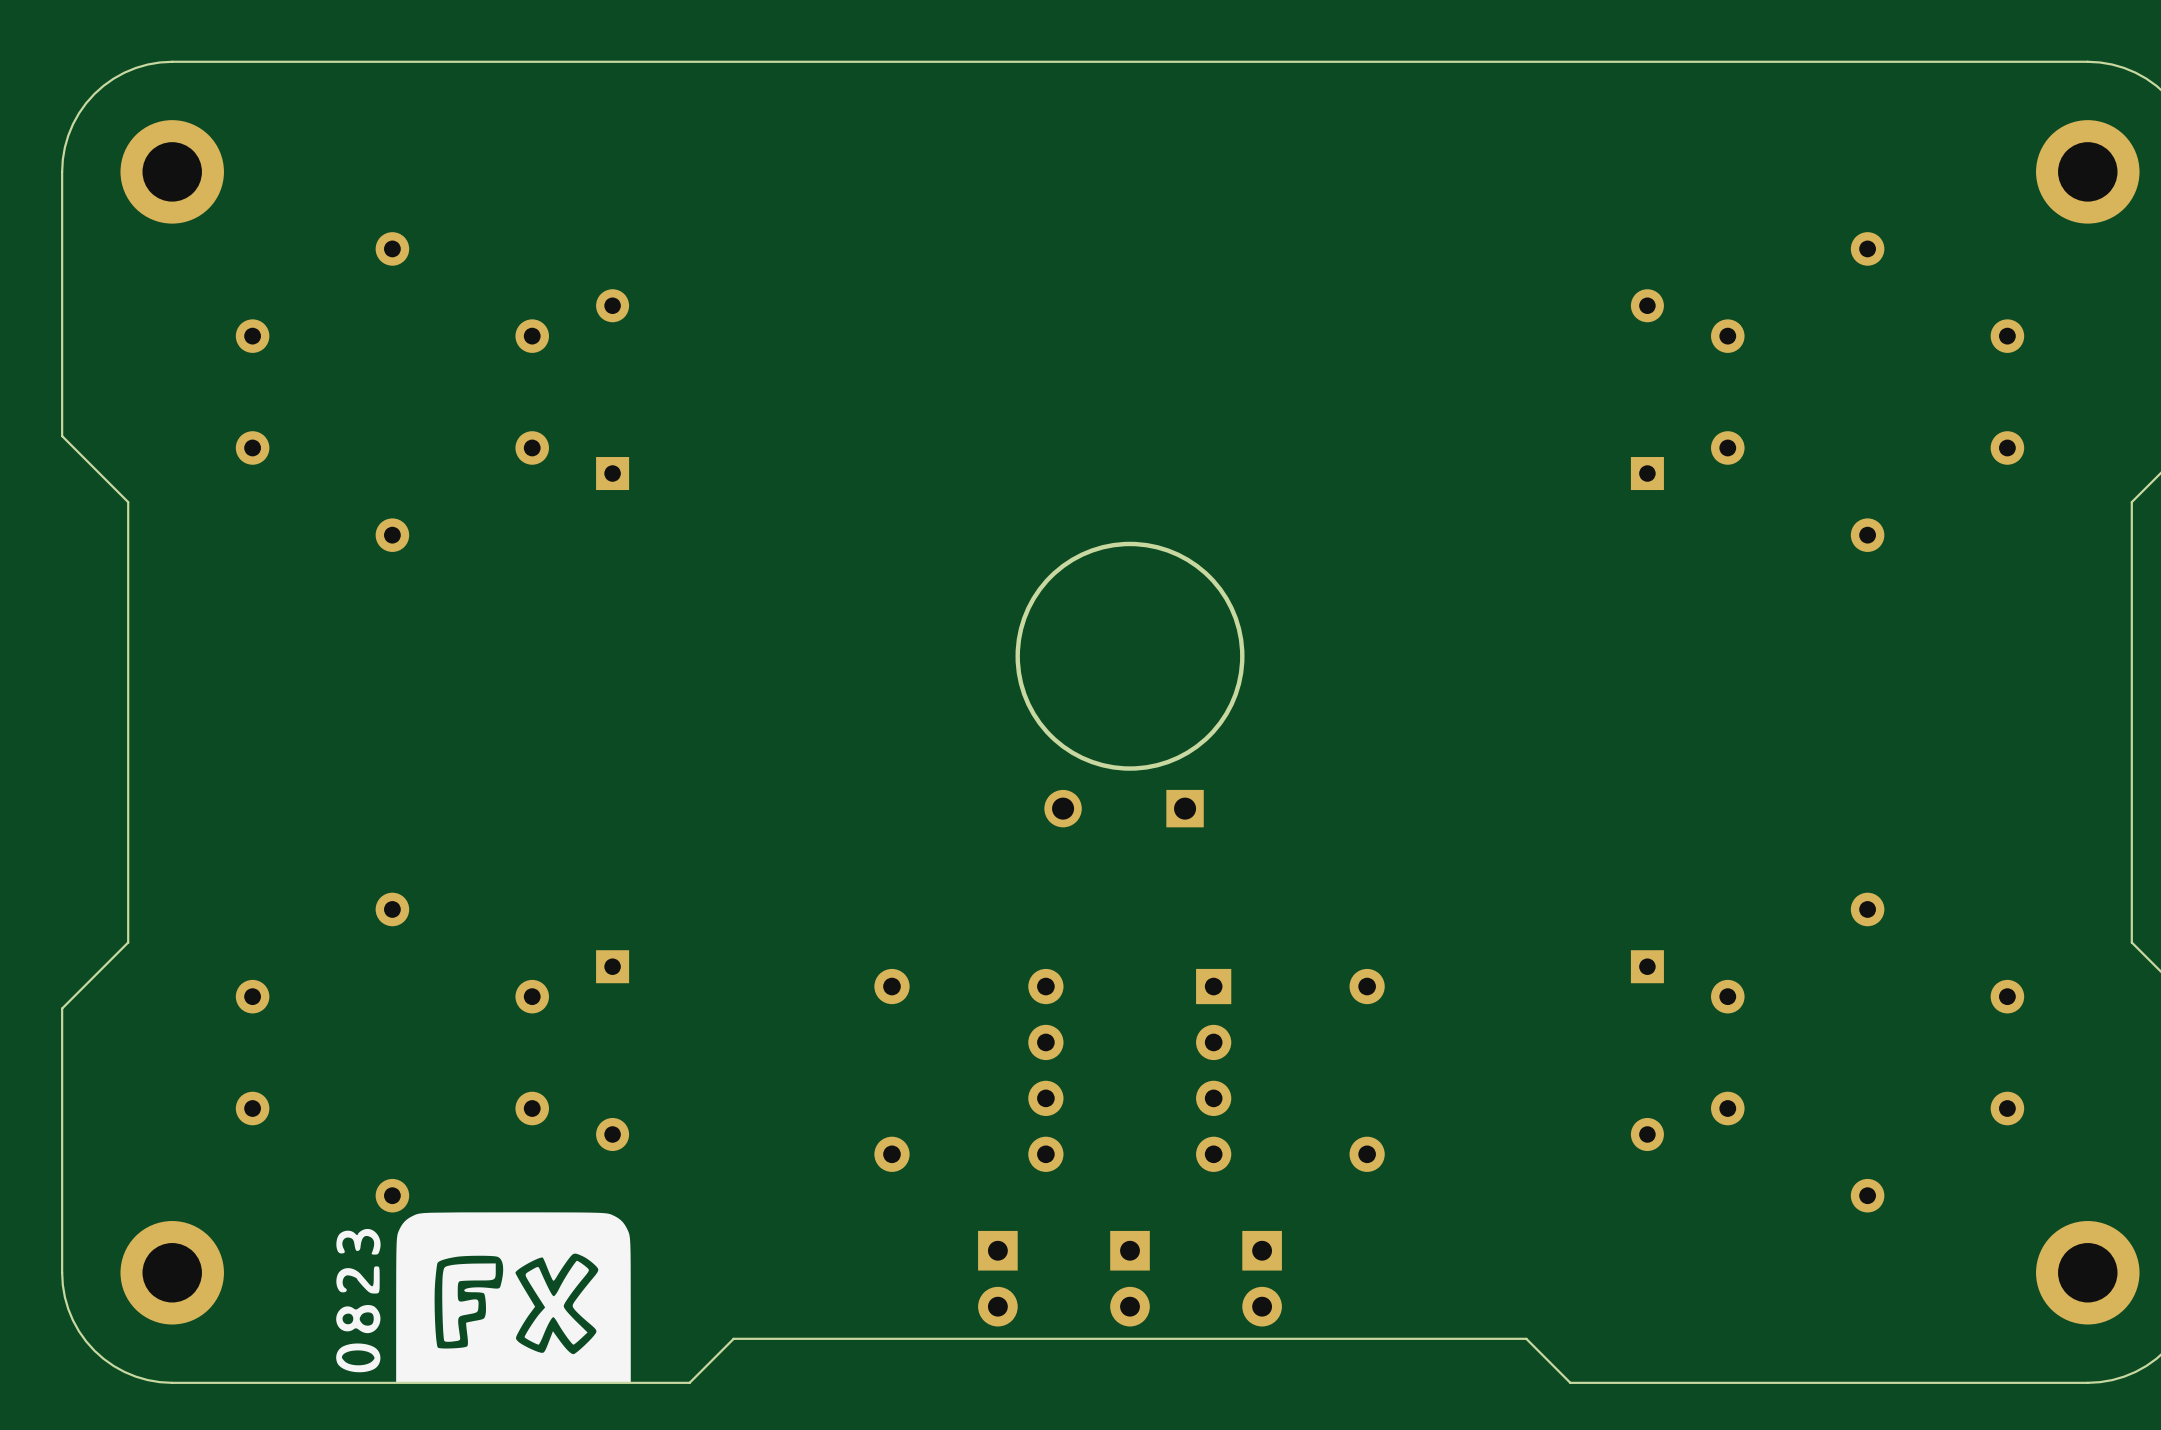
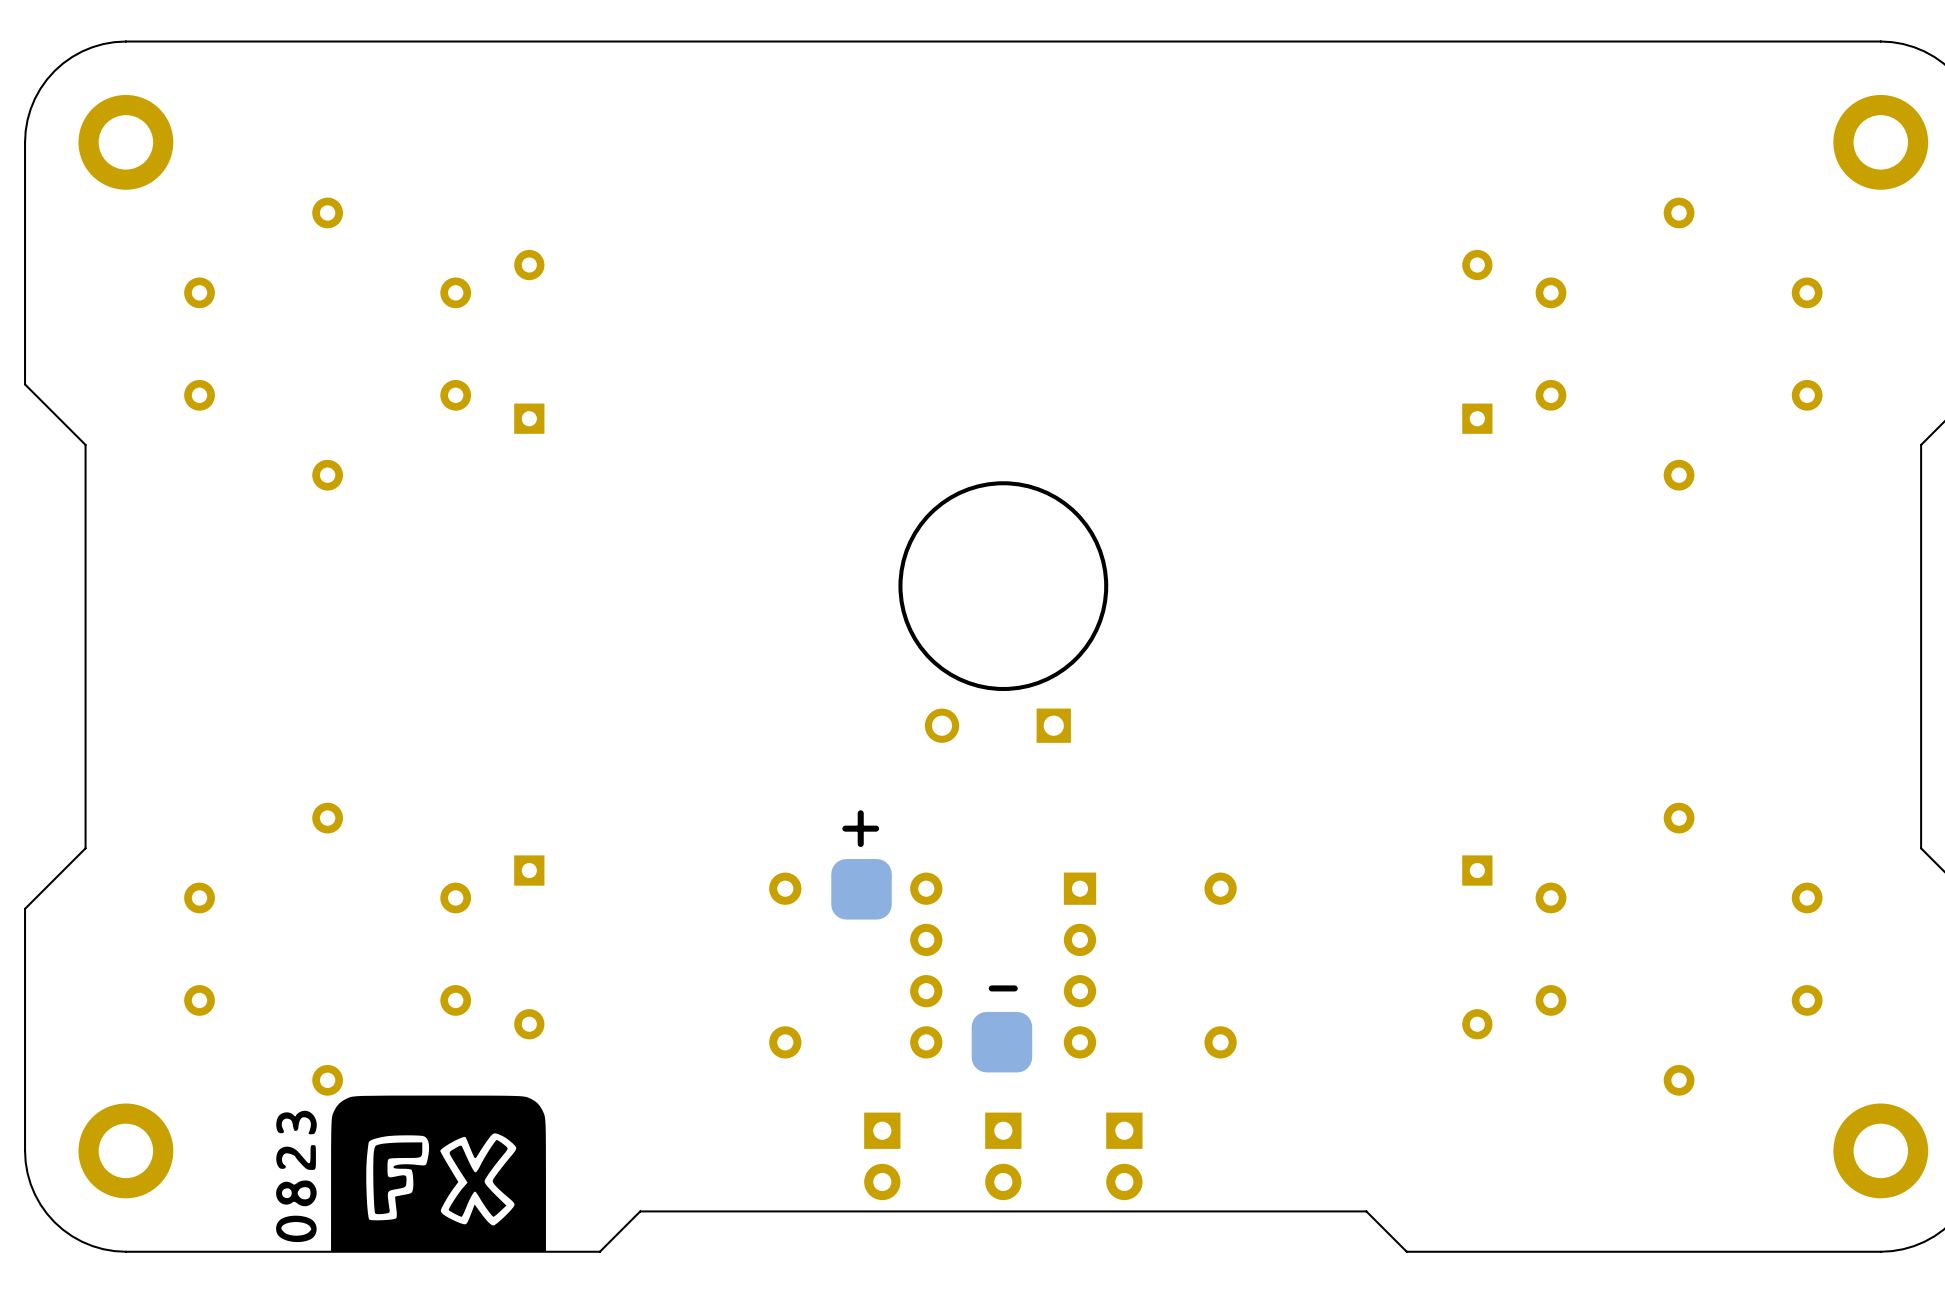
text: none -> + (860, 828)
part: none -> (861, 889)
text: none -> - (1003, 988)
part: none -> (1001, 1042)

